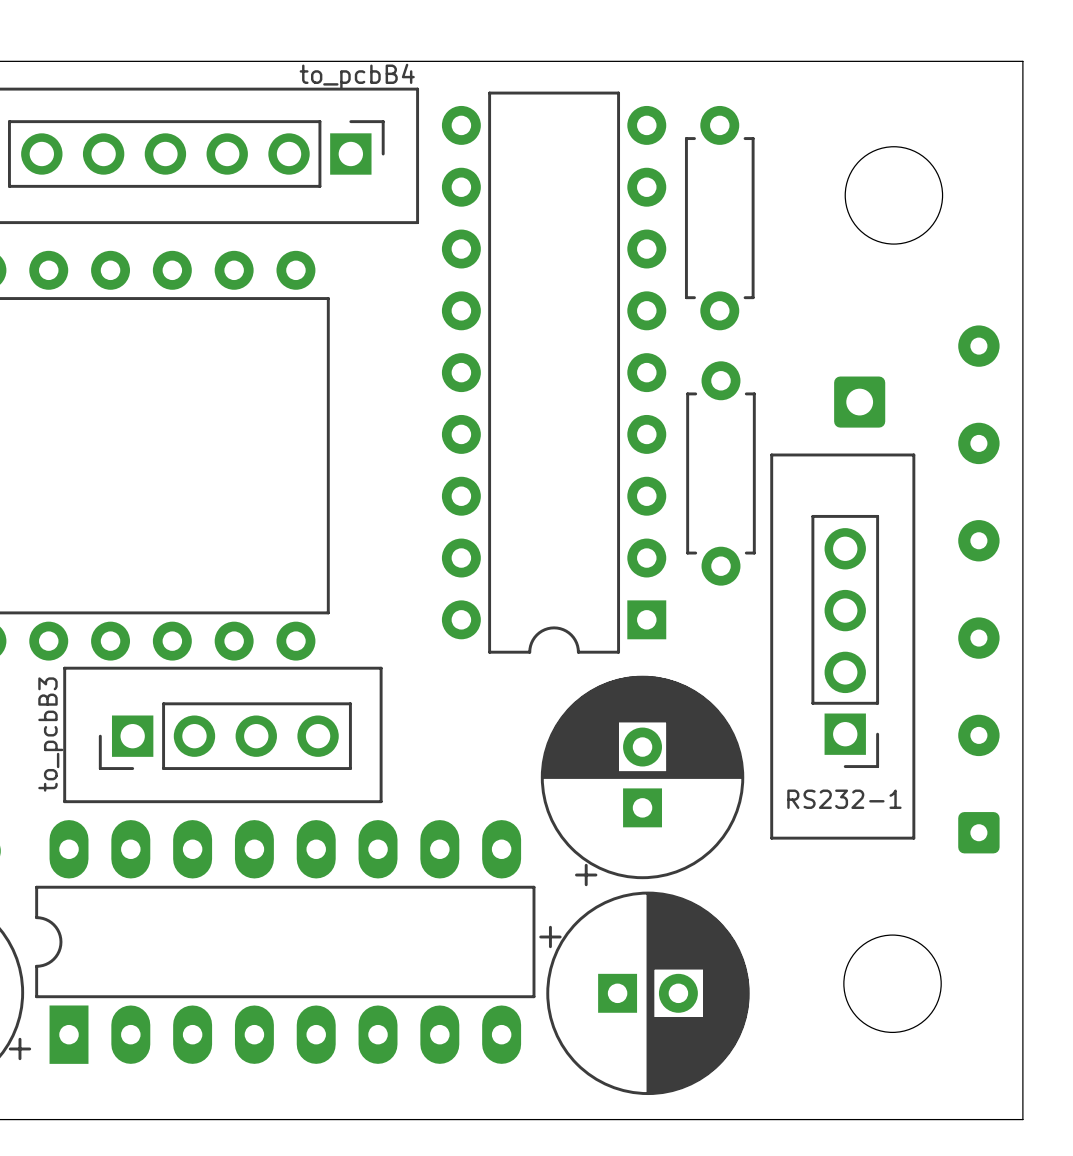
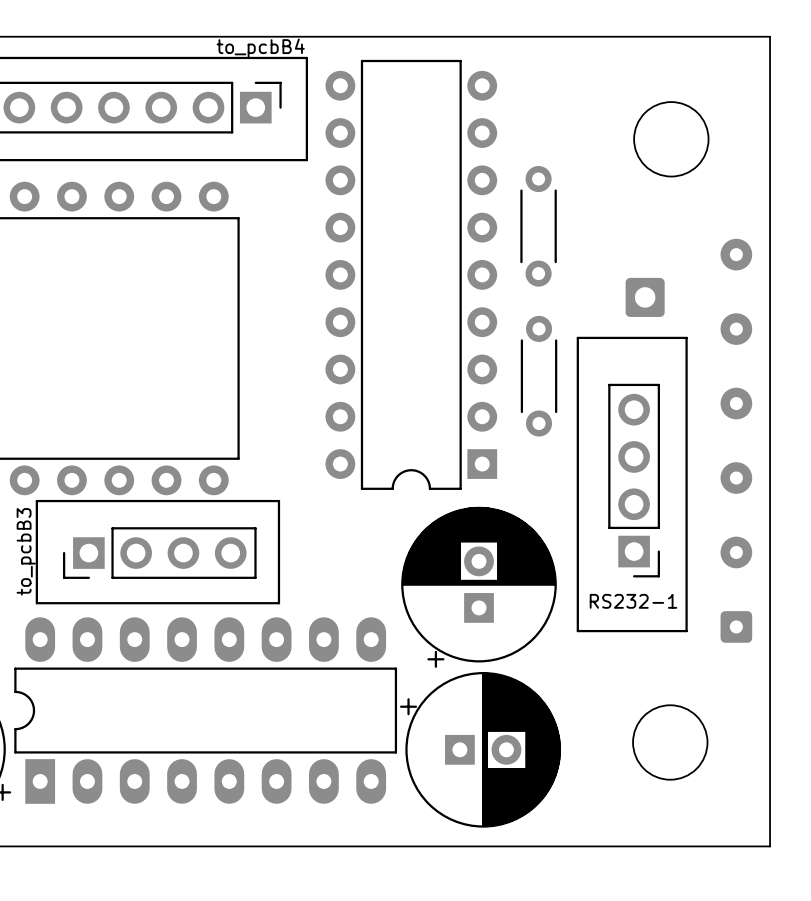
part: (719, 218) -> none
part: none -> (538, 226)
part: (720, 473) -> none
part: none -> (539, 376)

